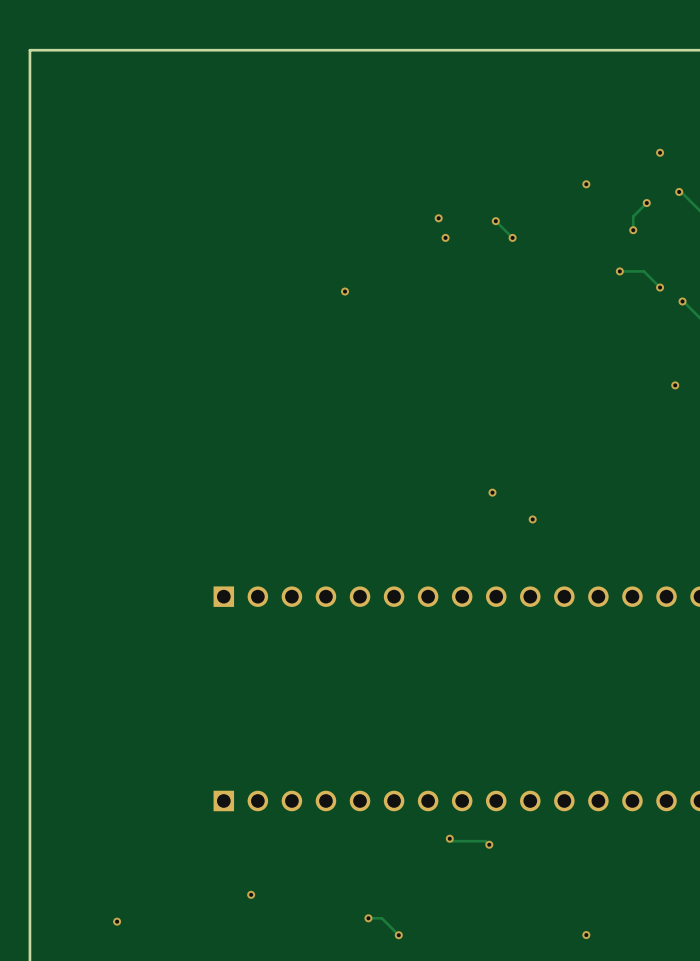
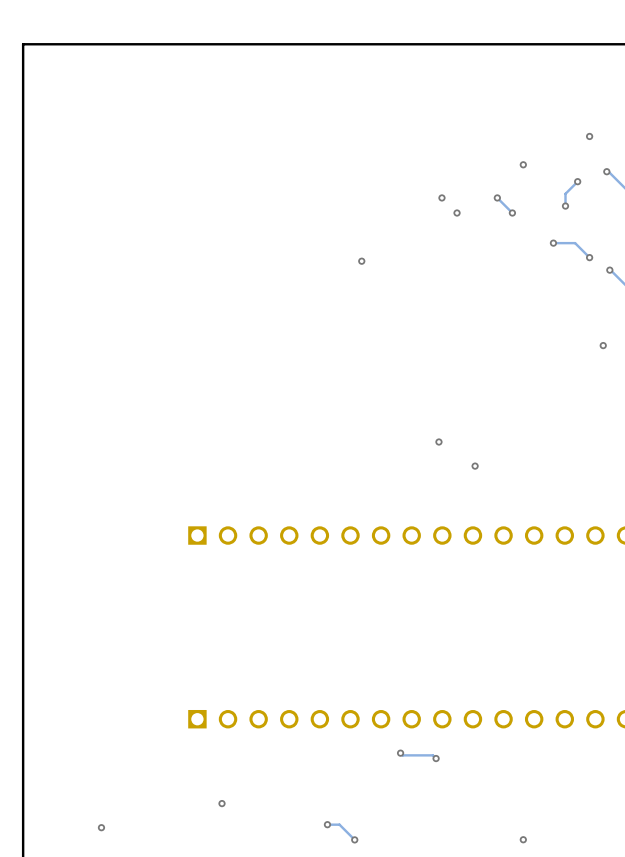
via: (438, 218) -> none
track: (495, 221) (512, 237) -> (497, 197) (512, 213)
via: none -> (497, 197)
via: (445, 237) -> none
via: none -> (512, 213)
via: (345, 291) -> none
via: none -> (361, 261)

